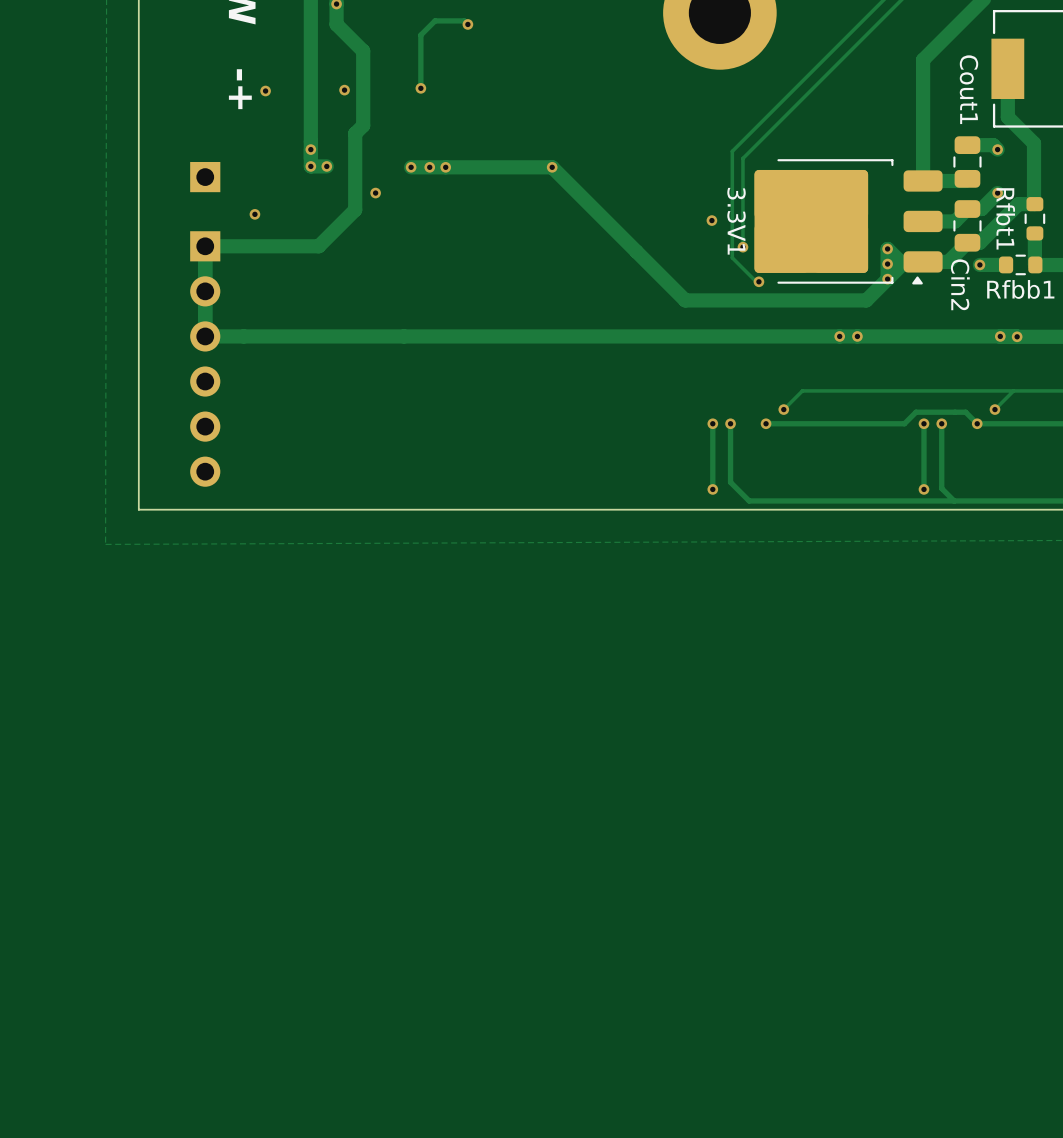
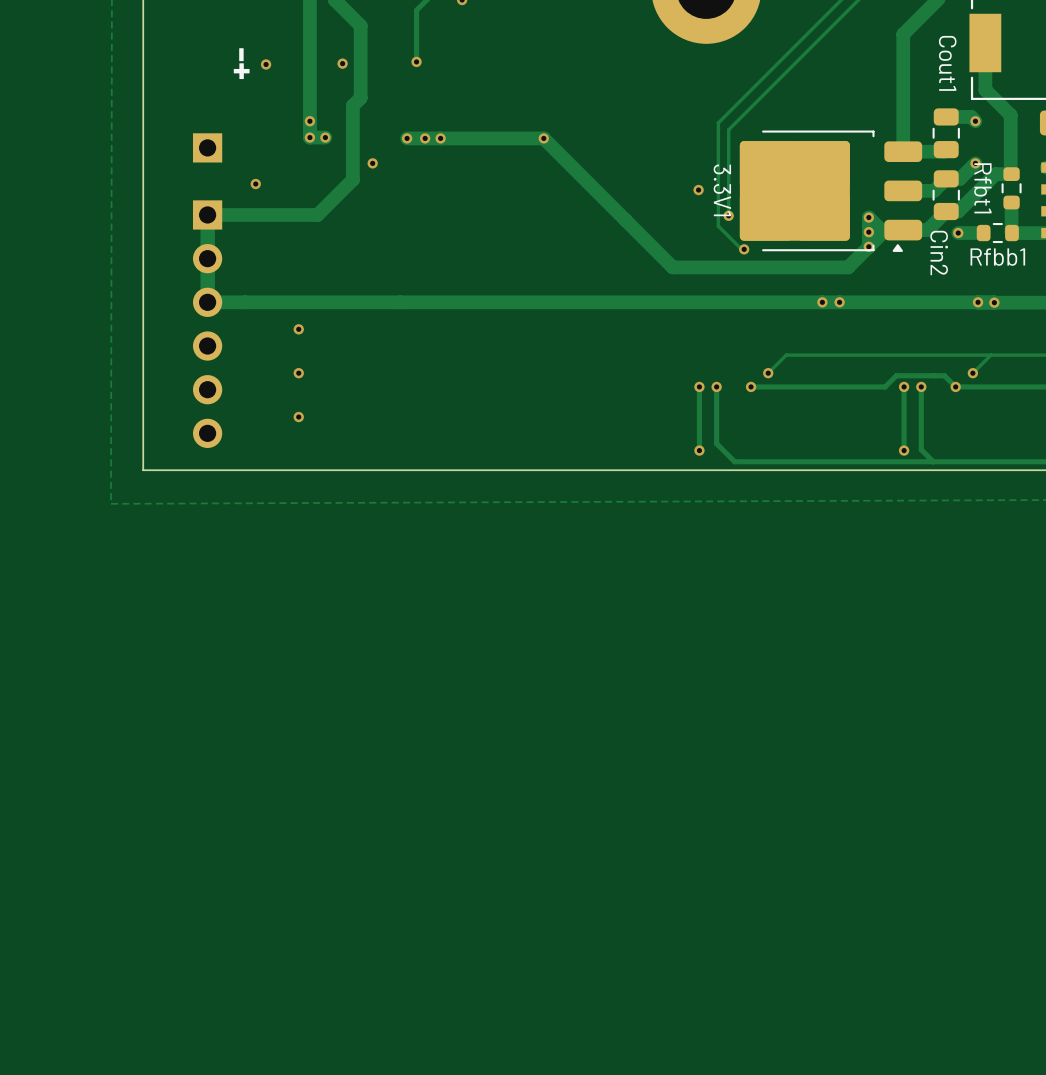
via: none -> (298, 329)
via: none -> (298, 373)
via: none -> (298, 417)

